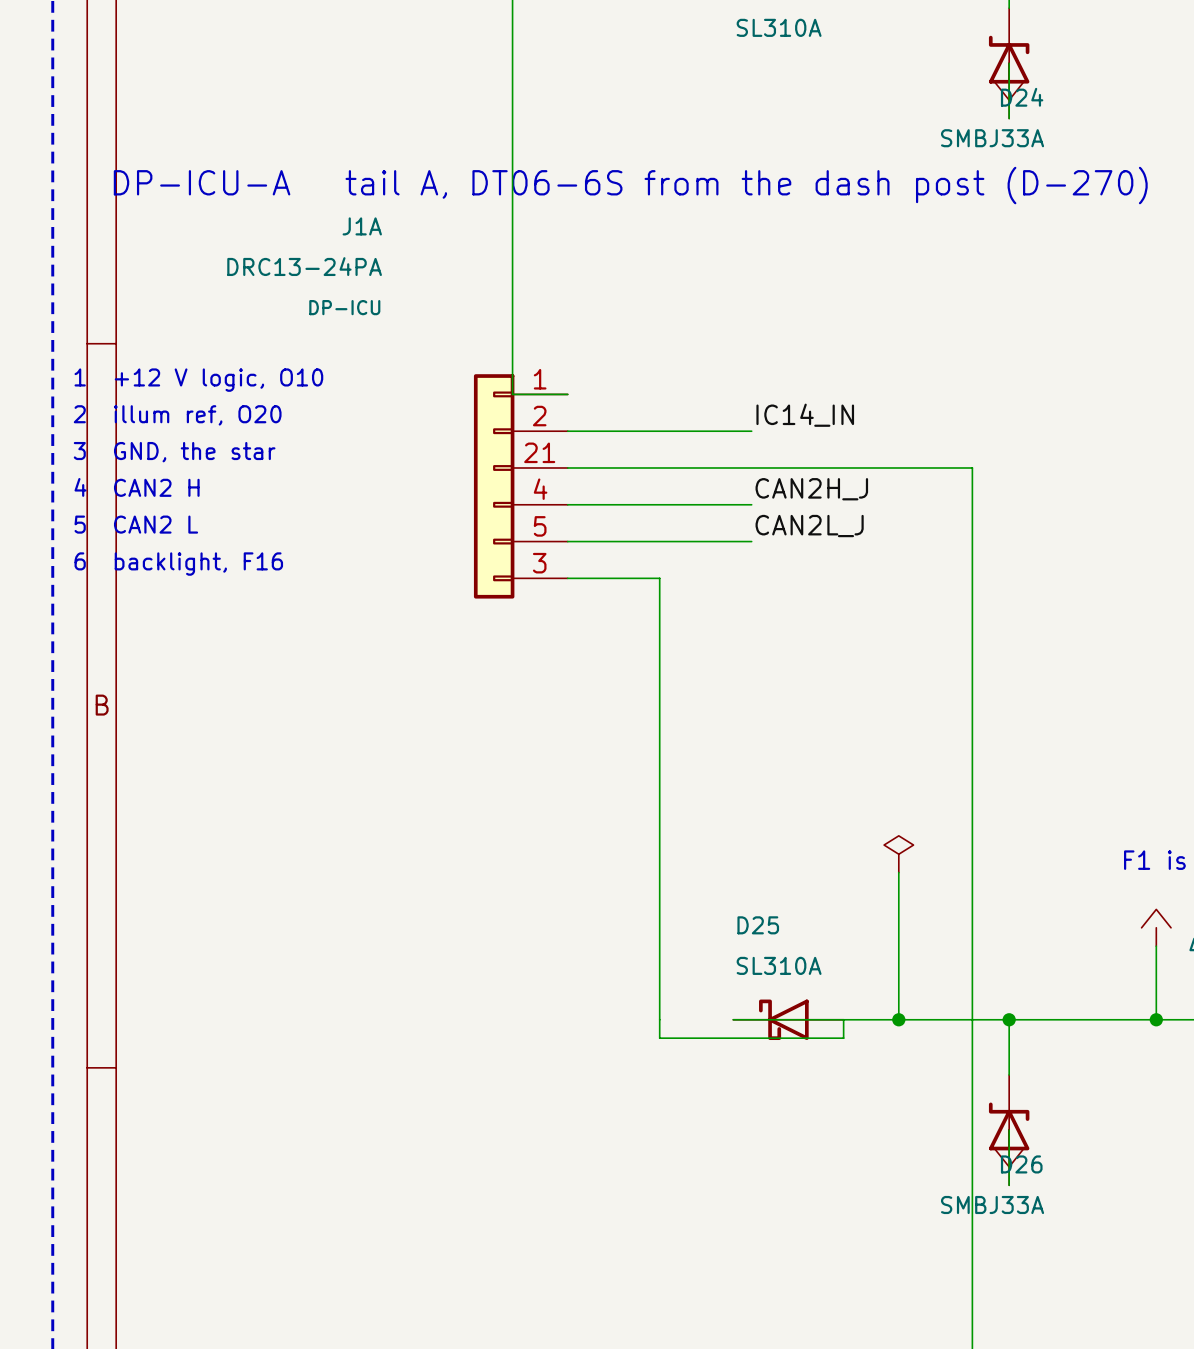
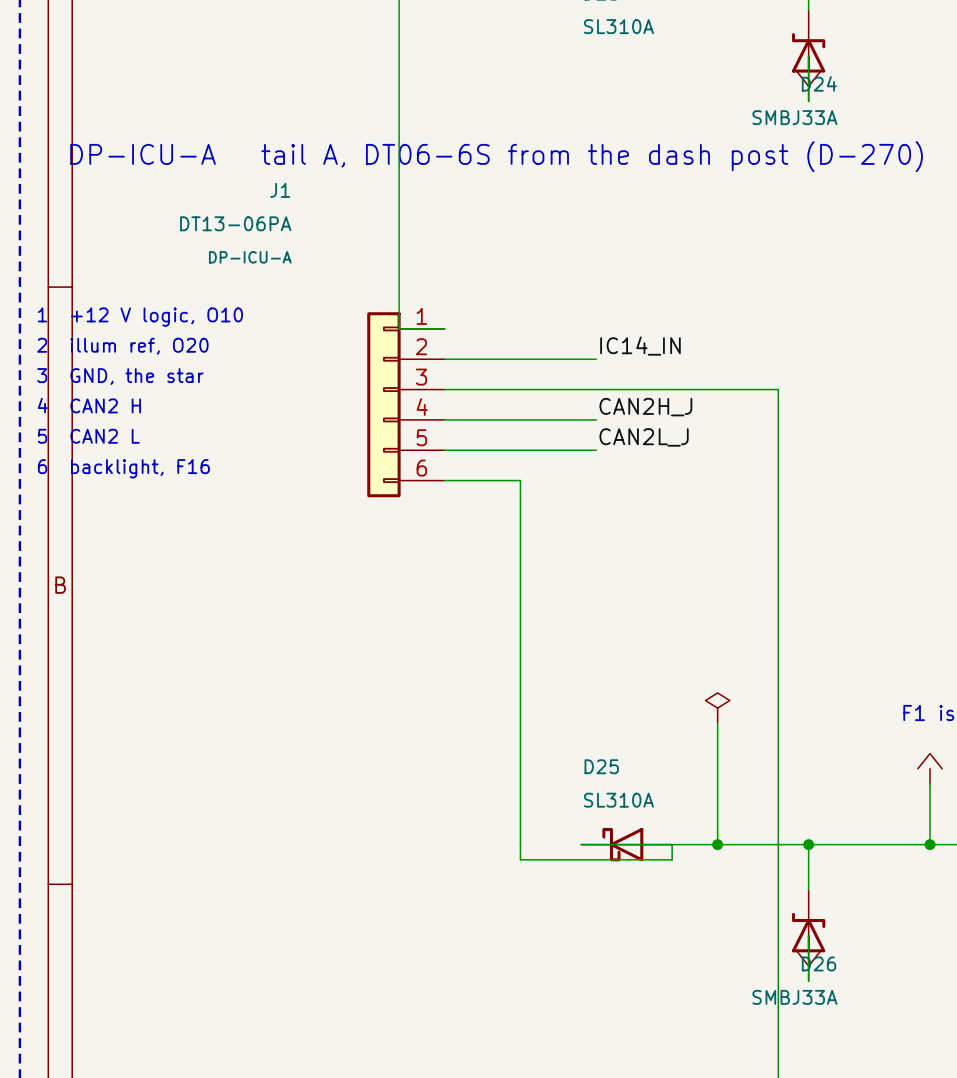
J1A name: J1A (362, 226) -> J1 (280, 190)
J1A value: DRC13-24PA (304, 266) -> DT13-06PA (235, 223)
J1A text: DP-ICU (344, 307) -> DP-ICU-A (250, 257)
J1A pin number: 21 (539, 452) -> 3 (421, 377)
J1A pin number: 3 (539, 563) -> 6 (421, 468)

